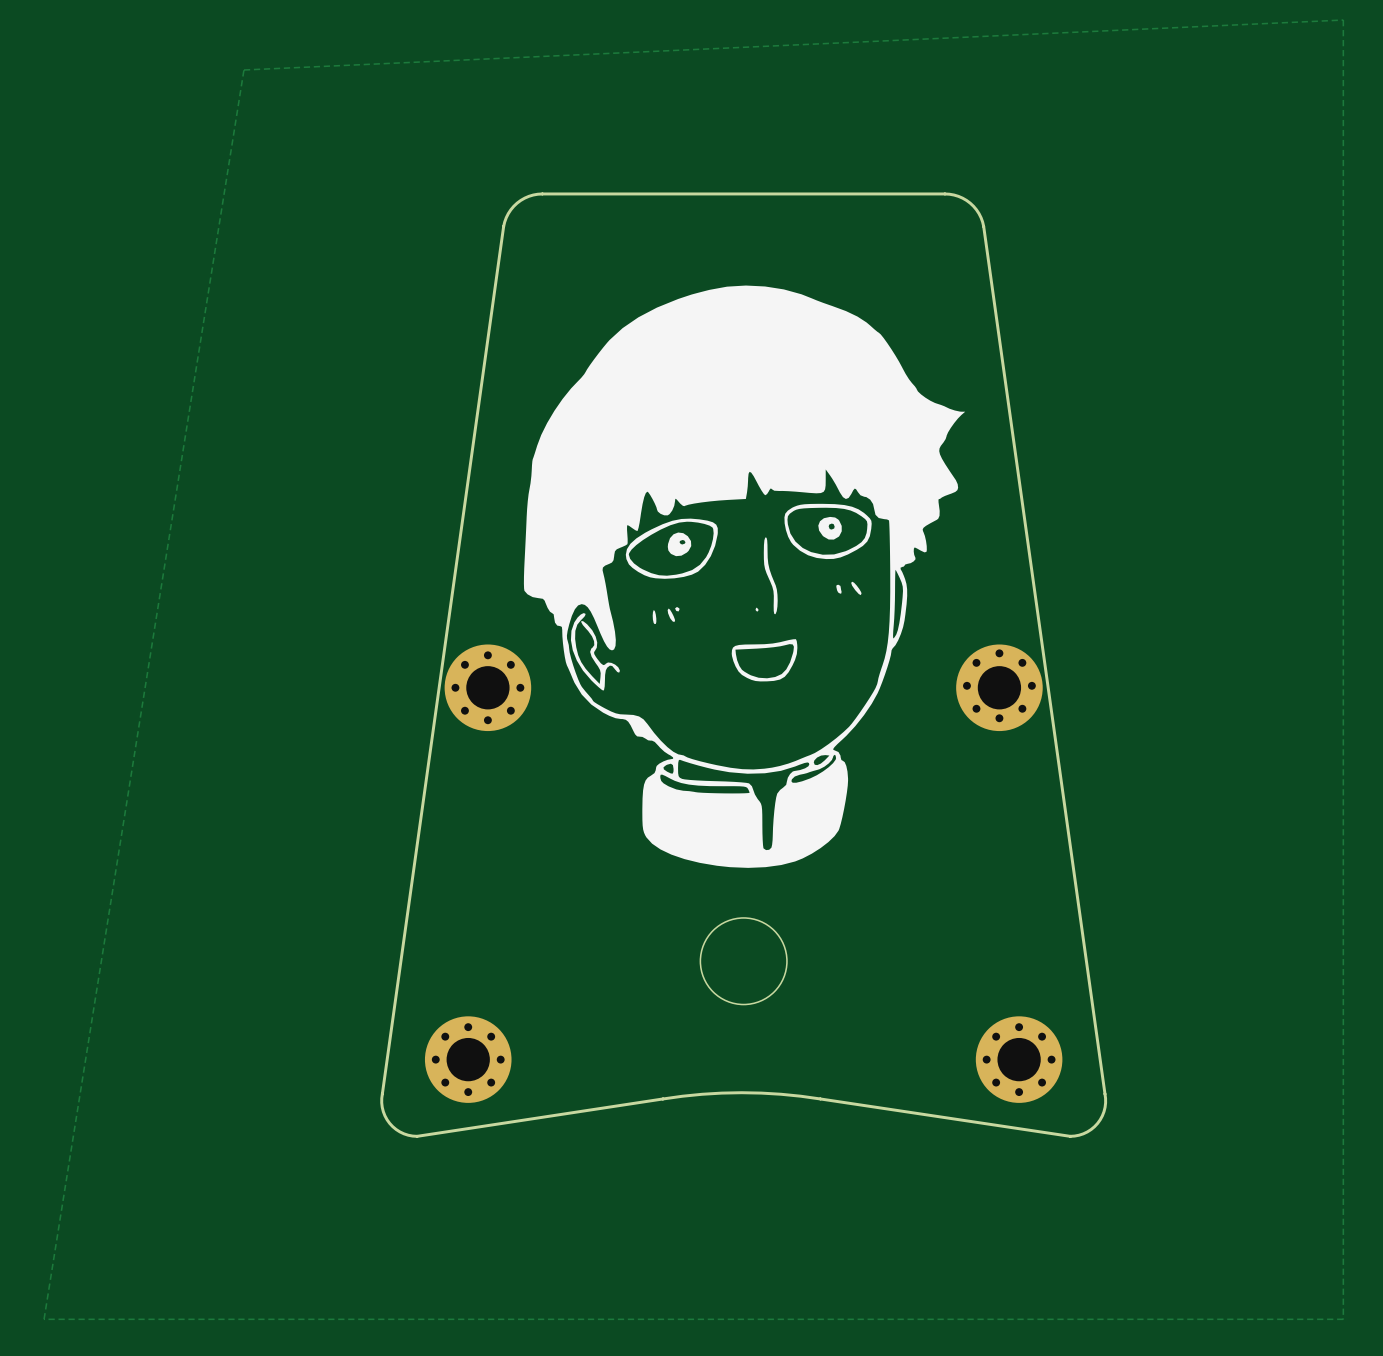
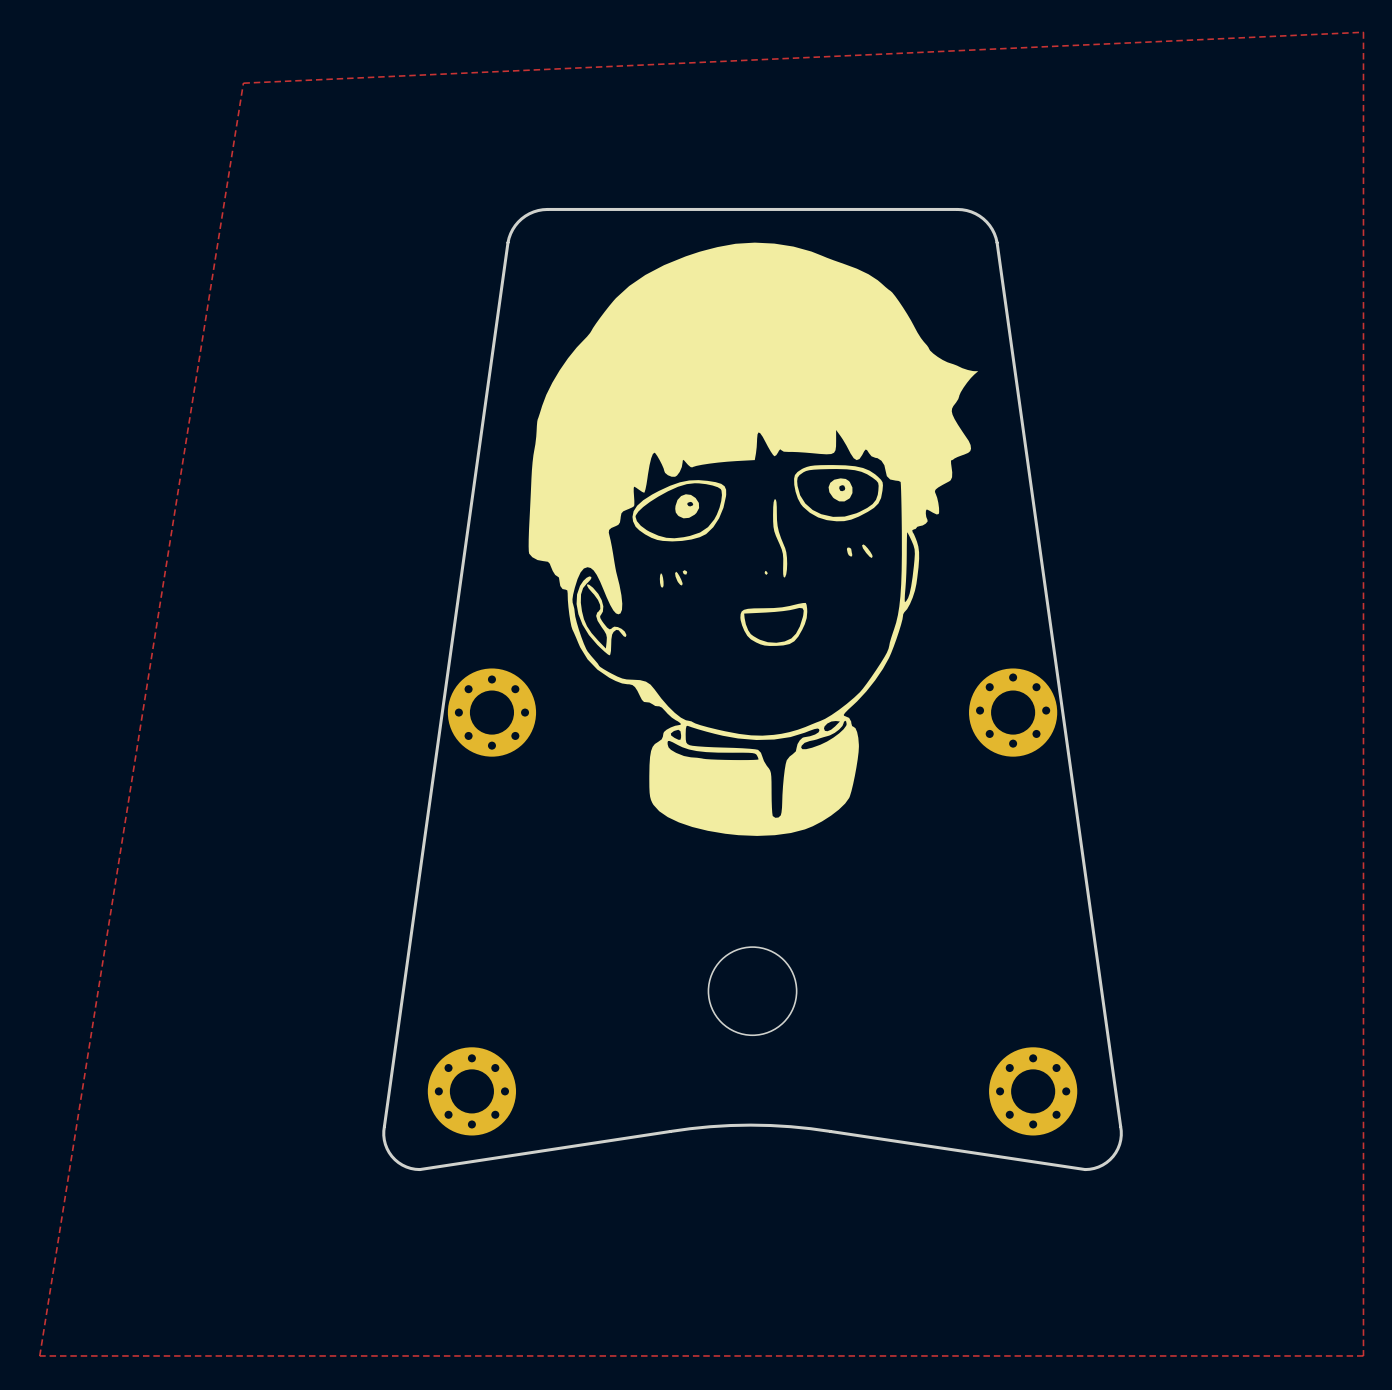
drawing position: (744, 576) -> (753, 539)

